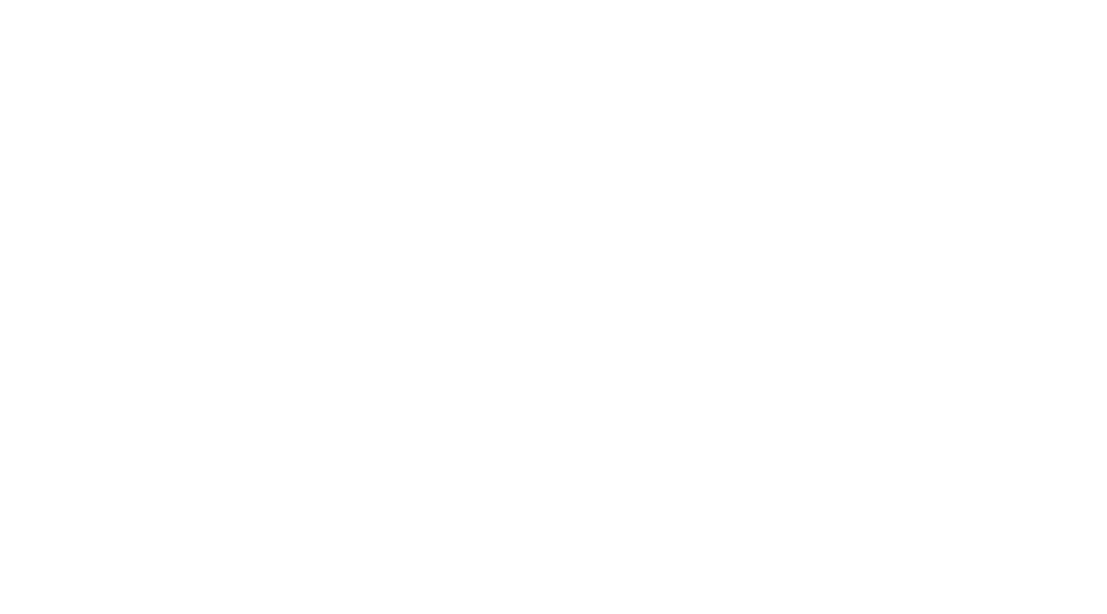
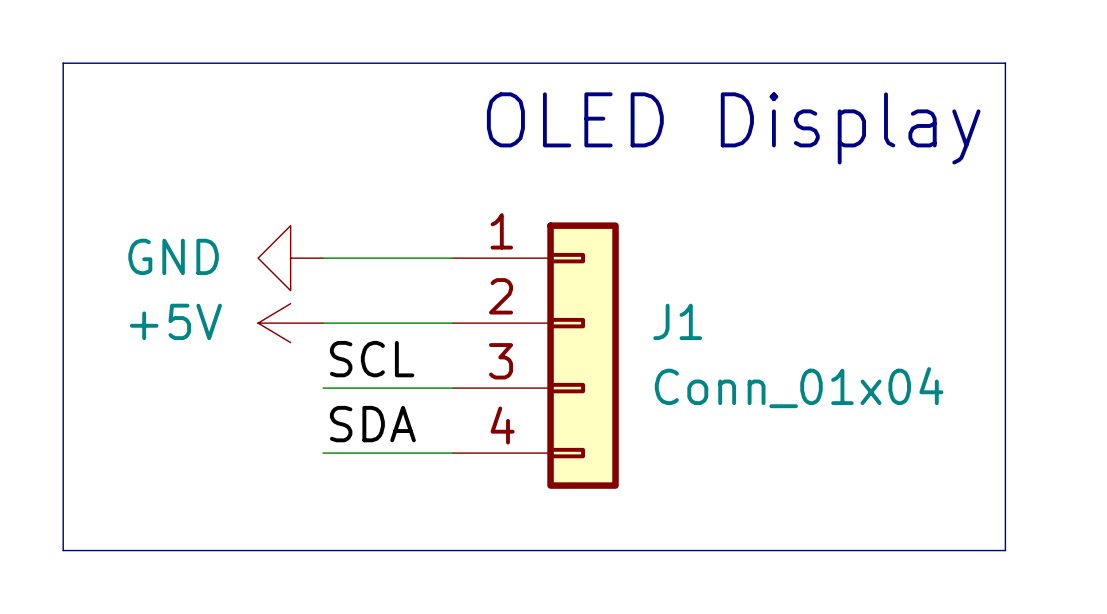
line: none -> (63, 63) (1005, 63) (1005, 550) (63, 550) (63, 63)
text: none -> OLED Display (733, 128)
power symbol: none -> GND (290, 258)
wire: none -> (323, 258) (453, 258)
power symbol: none -> +5V (290, 323)
wire: none -> (323, 323) (453, 323)
J1: none -> Conn_01x04 (535, 355)
label: none -> SCL (372, 359)
wire: none -> (323, 388) (453, 388)
label: none -> SDA (372, 424)
wire: none -> (323, 453) (453, 453)

